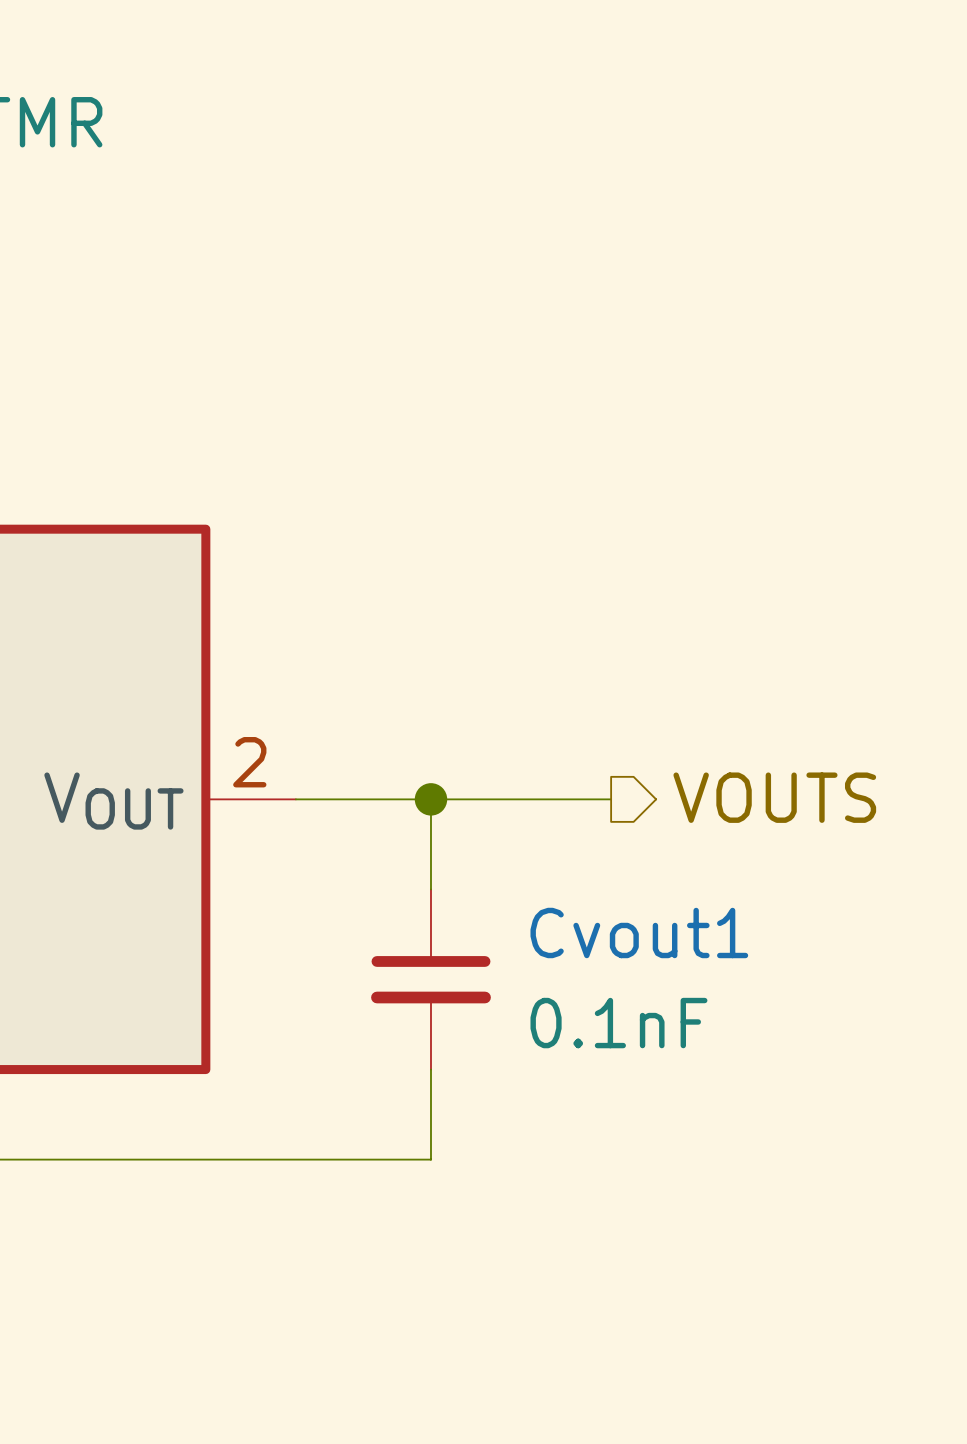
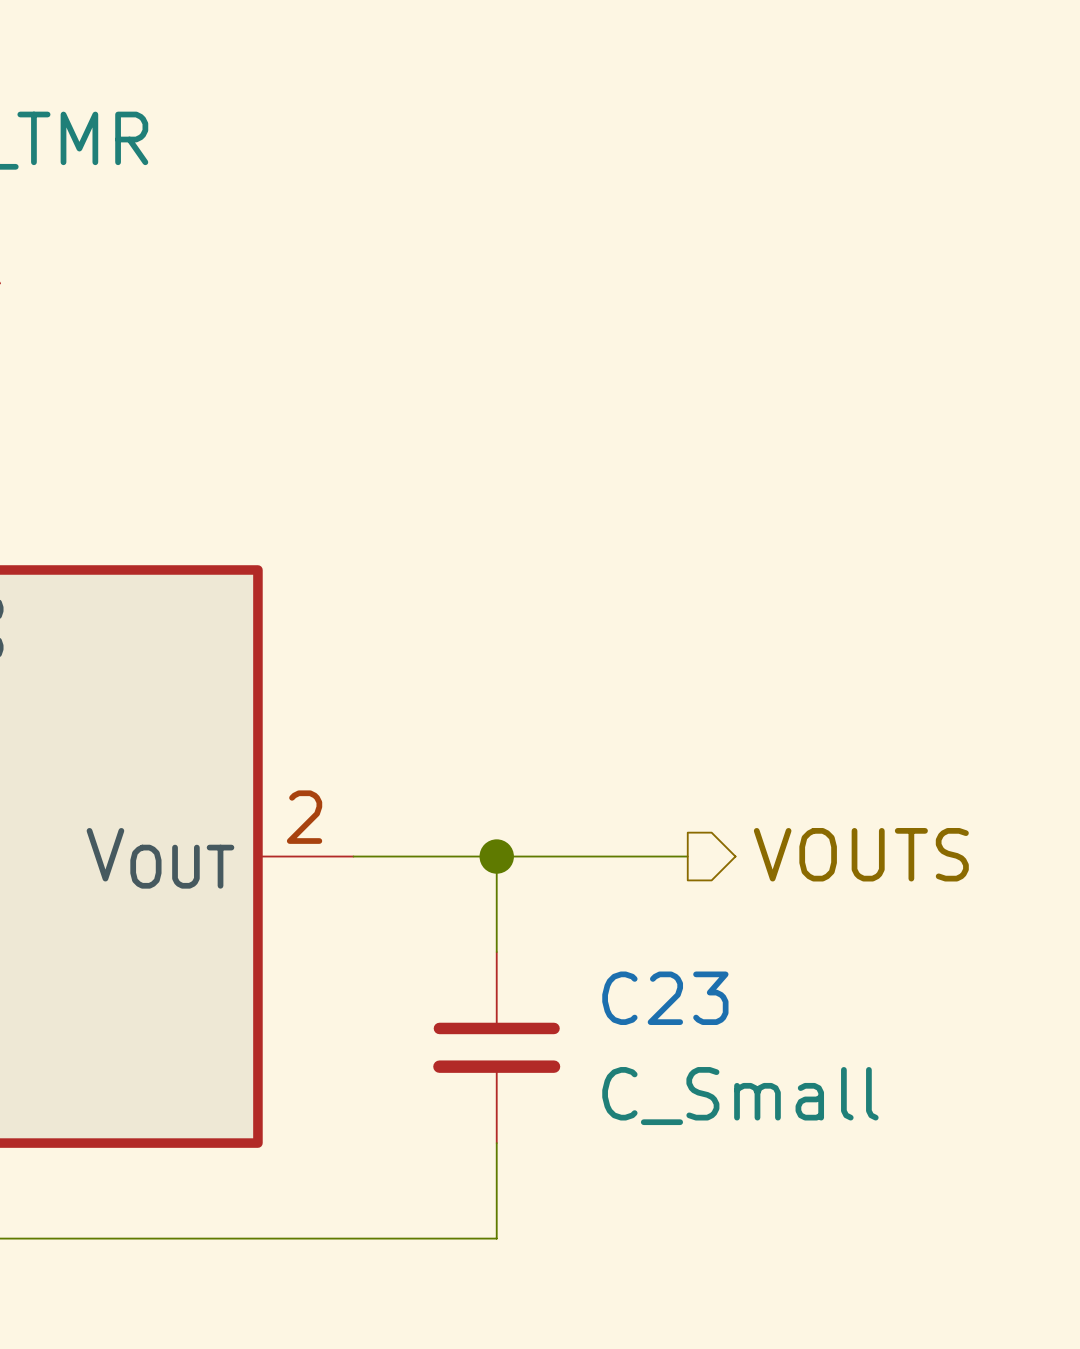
Cvout1 name: Cvout1 (639, 932) -> C23 (665, 998)
Cvout1 value: 0.1nF (618, 1023) -> C_Small (740, 1096)

